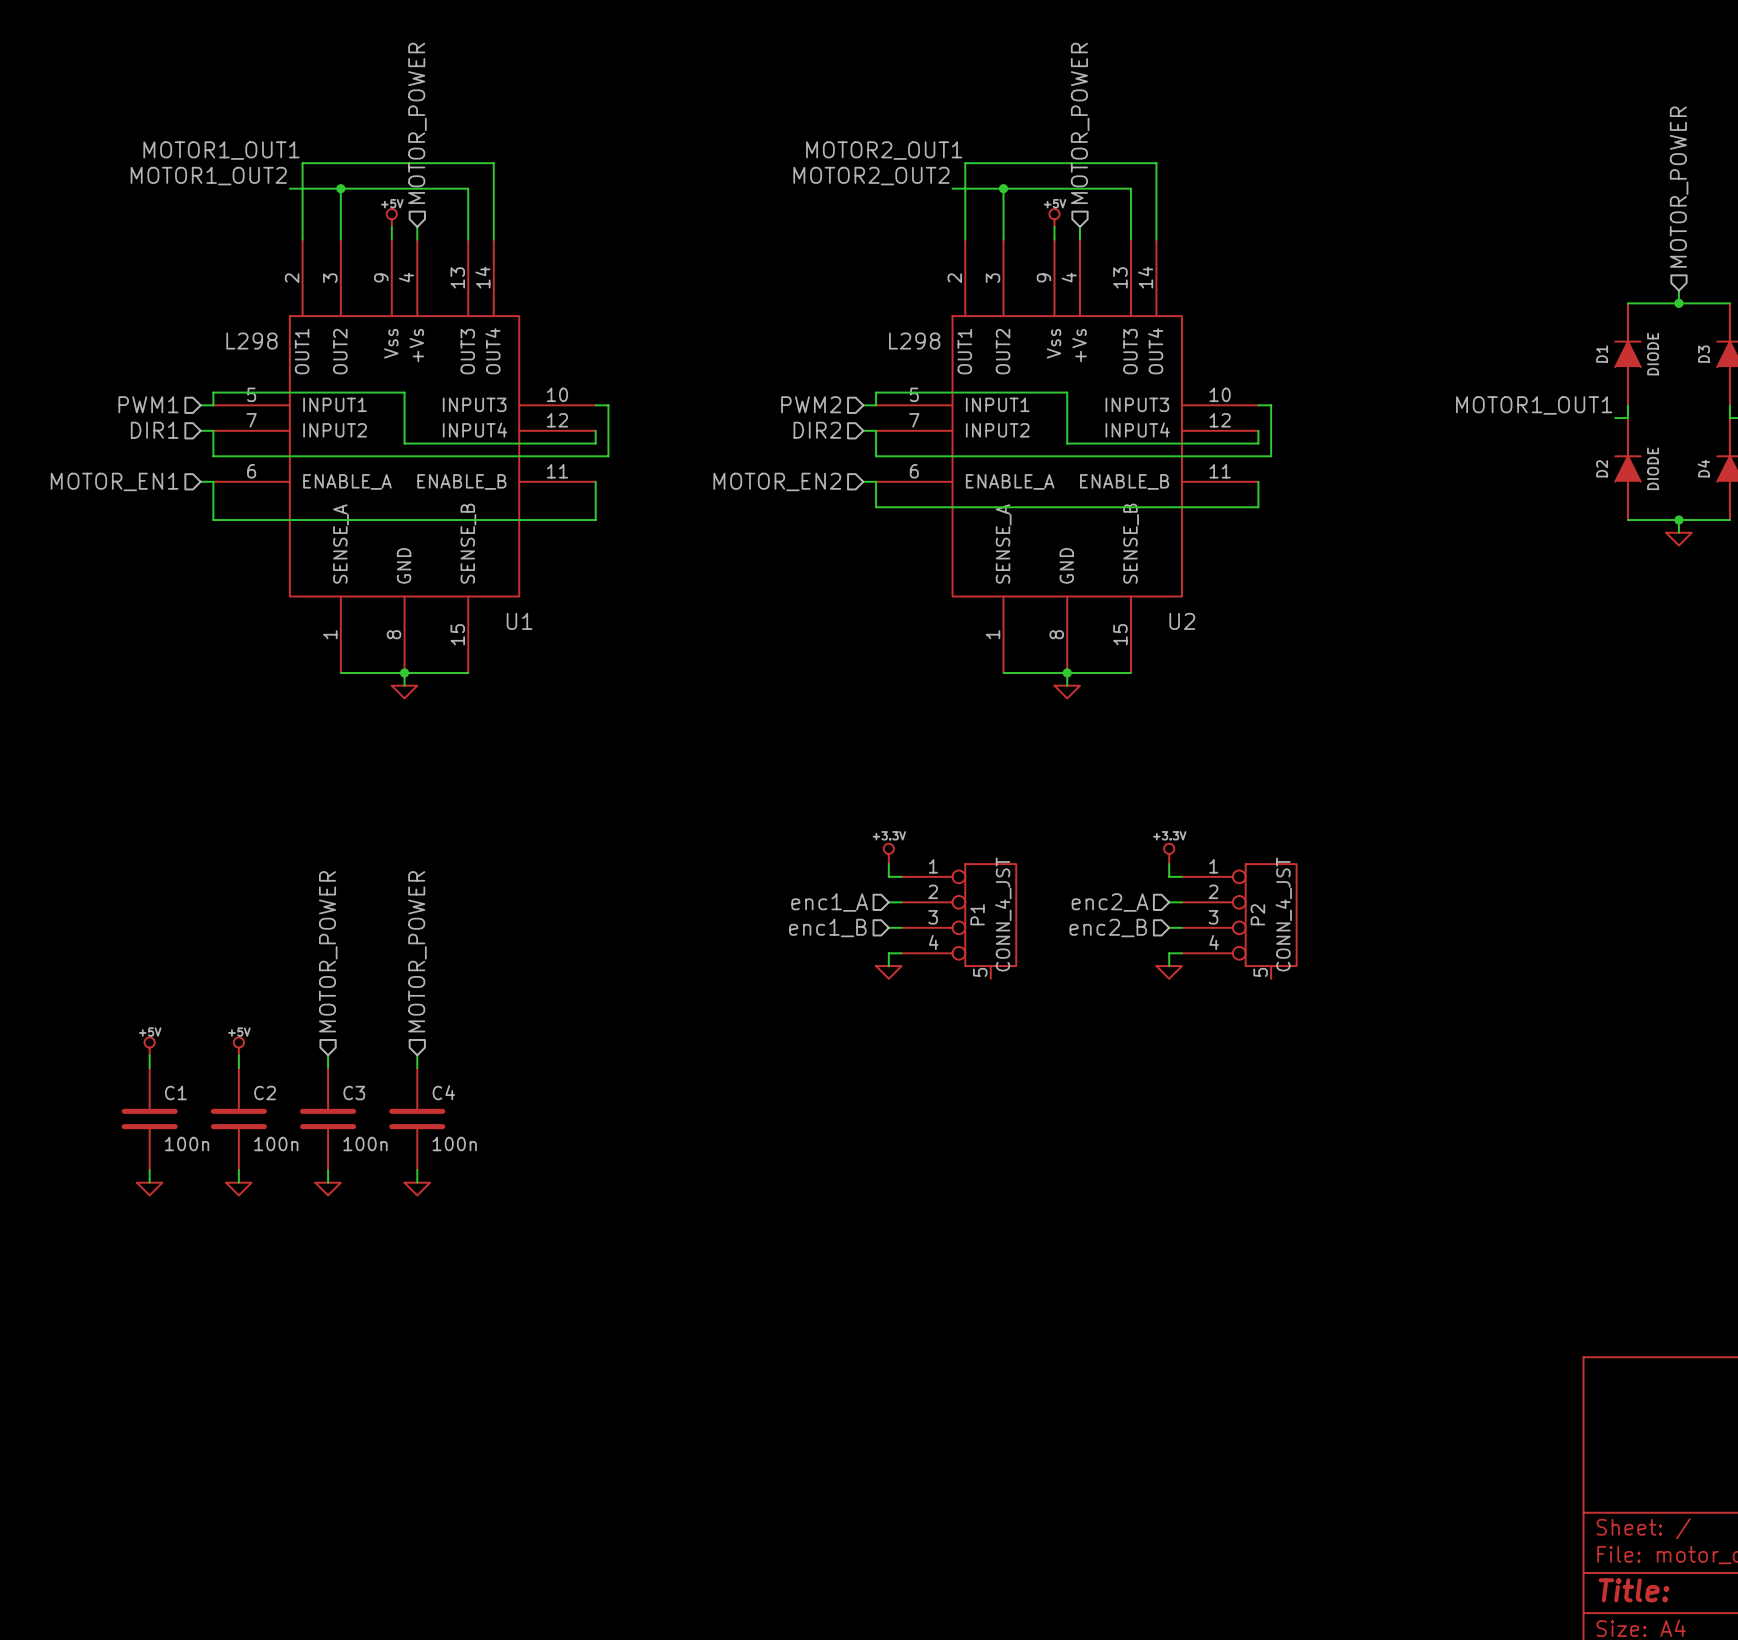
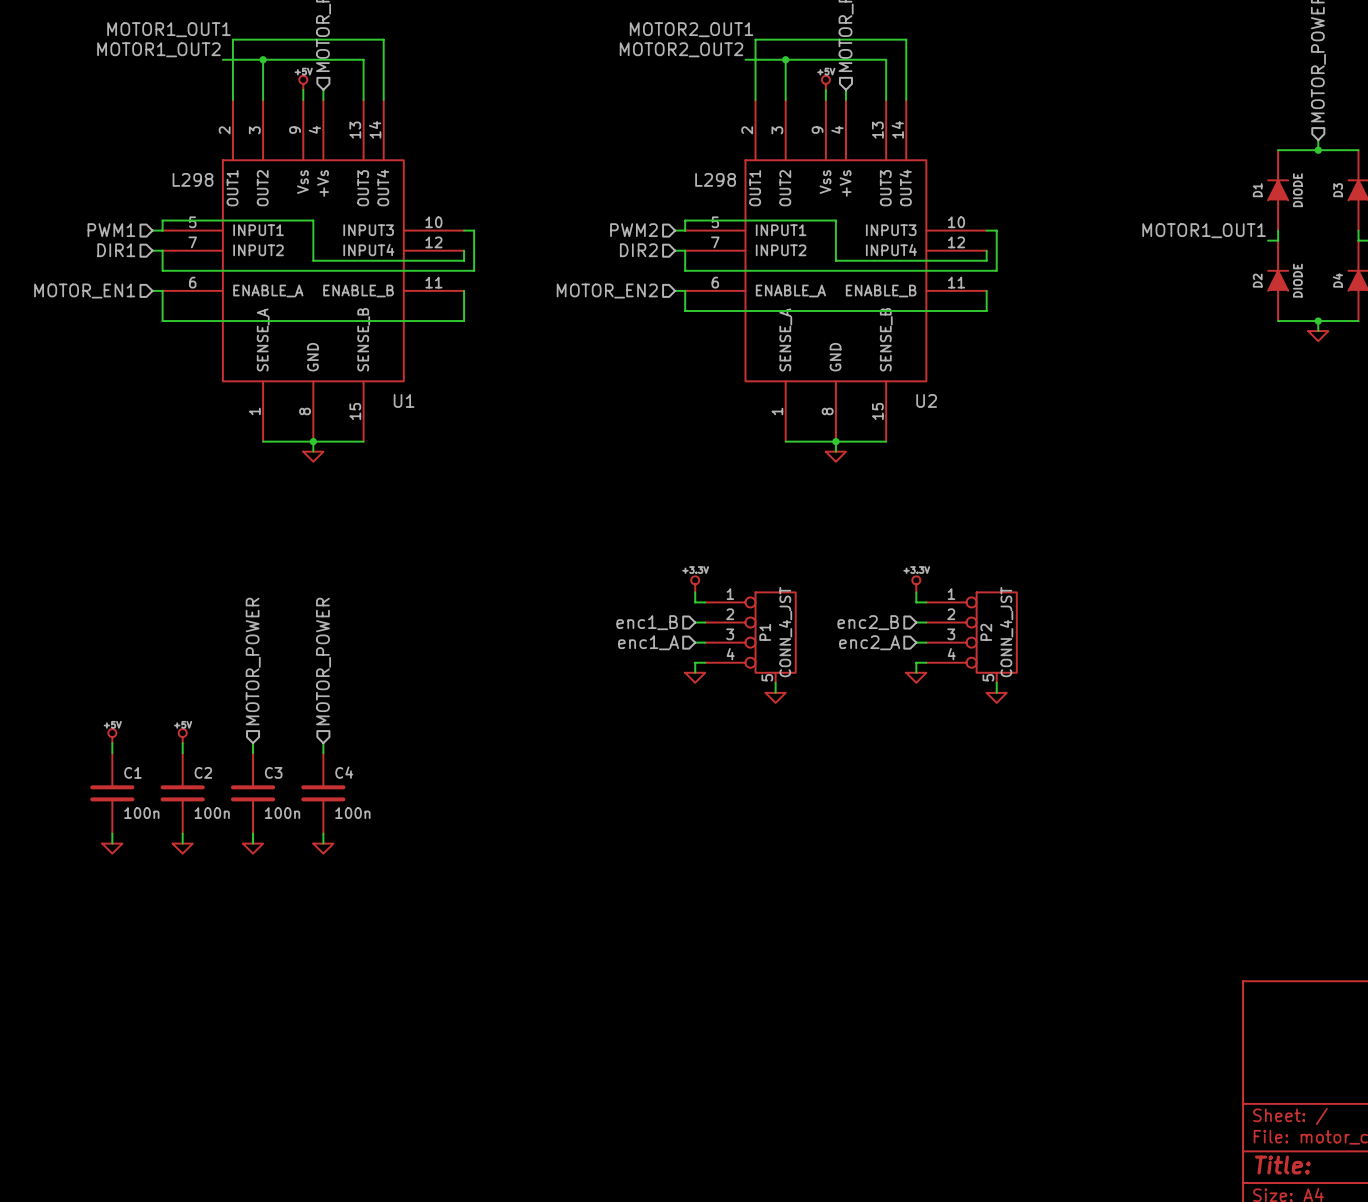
hierarchical label: enc1_A (829, 902) -> enc1_B (647, 622)
hierarchical label: enc2_A (1110, 902) -> enc2_B (868, 622)
hierarchical label: enc1_B (827, 927) -> enc1_A (648, 642)
hierarchical label: enc2_B (1108, 927) -> enc2_A (869, 642)
wire: none -> (775, 682) (775, 692)
wire: none -> (996, 682) (996, 692)
power symbol: none -> (775, 697)
power symbol: none -> (996, 697)

